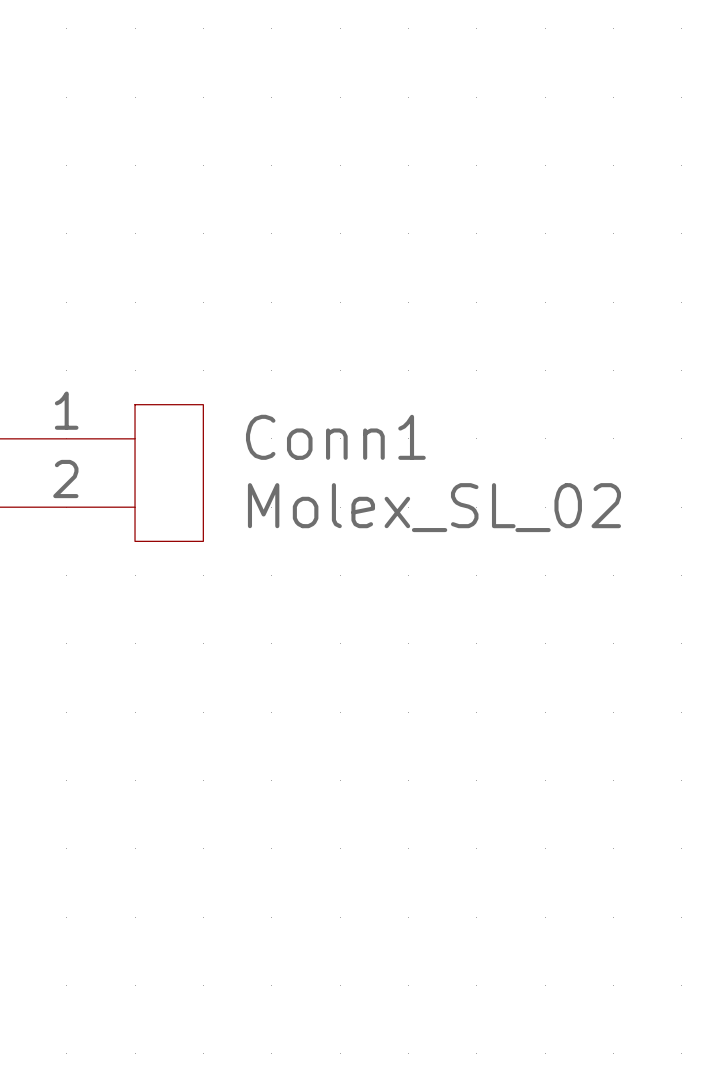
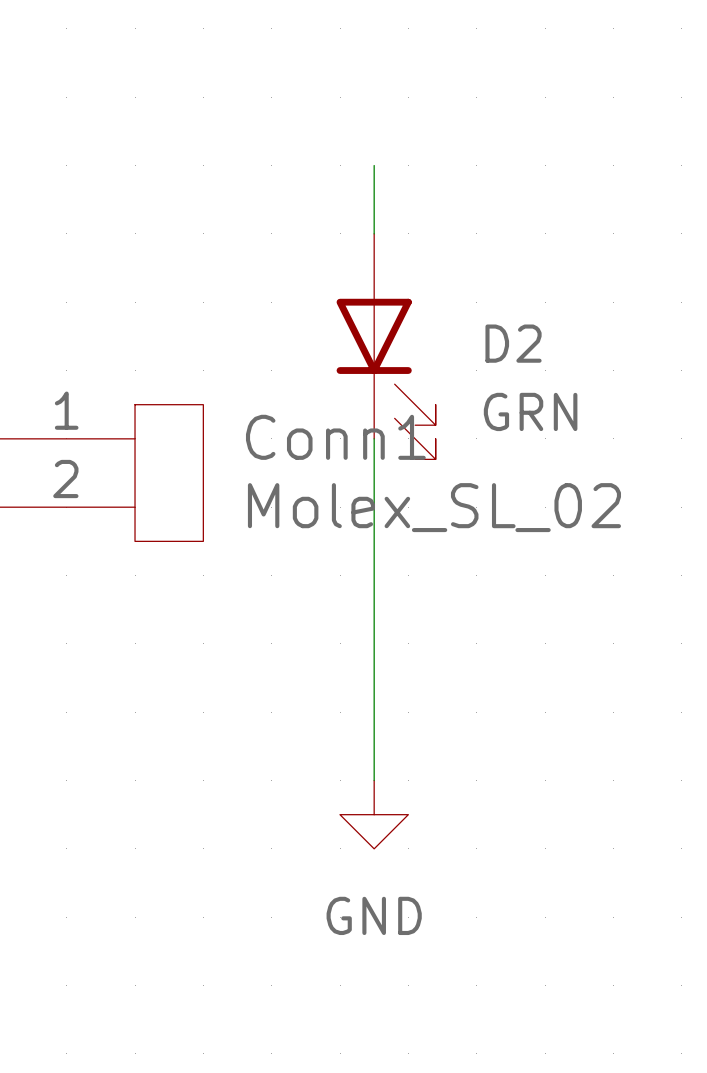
wire: none -> (374, 165) (374, 233)
D2: none -> GRN (386, 346)
wire: none -> (374, 438) (374, 780)
power symbol: none -> GND (374, 814)

